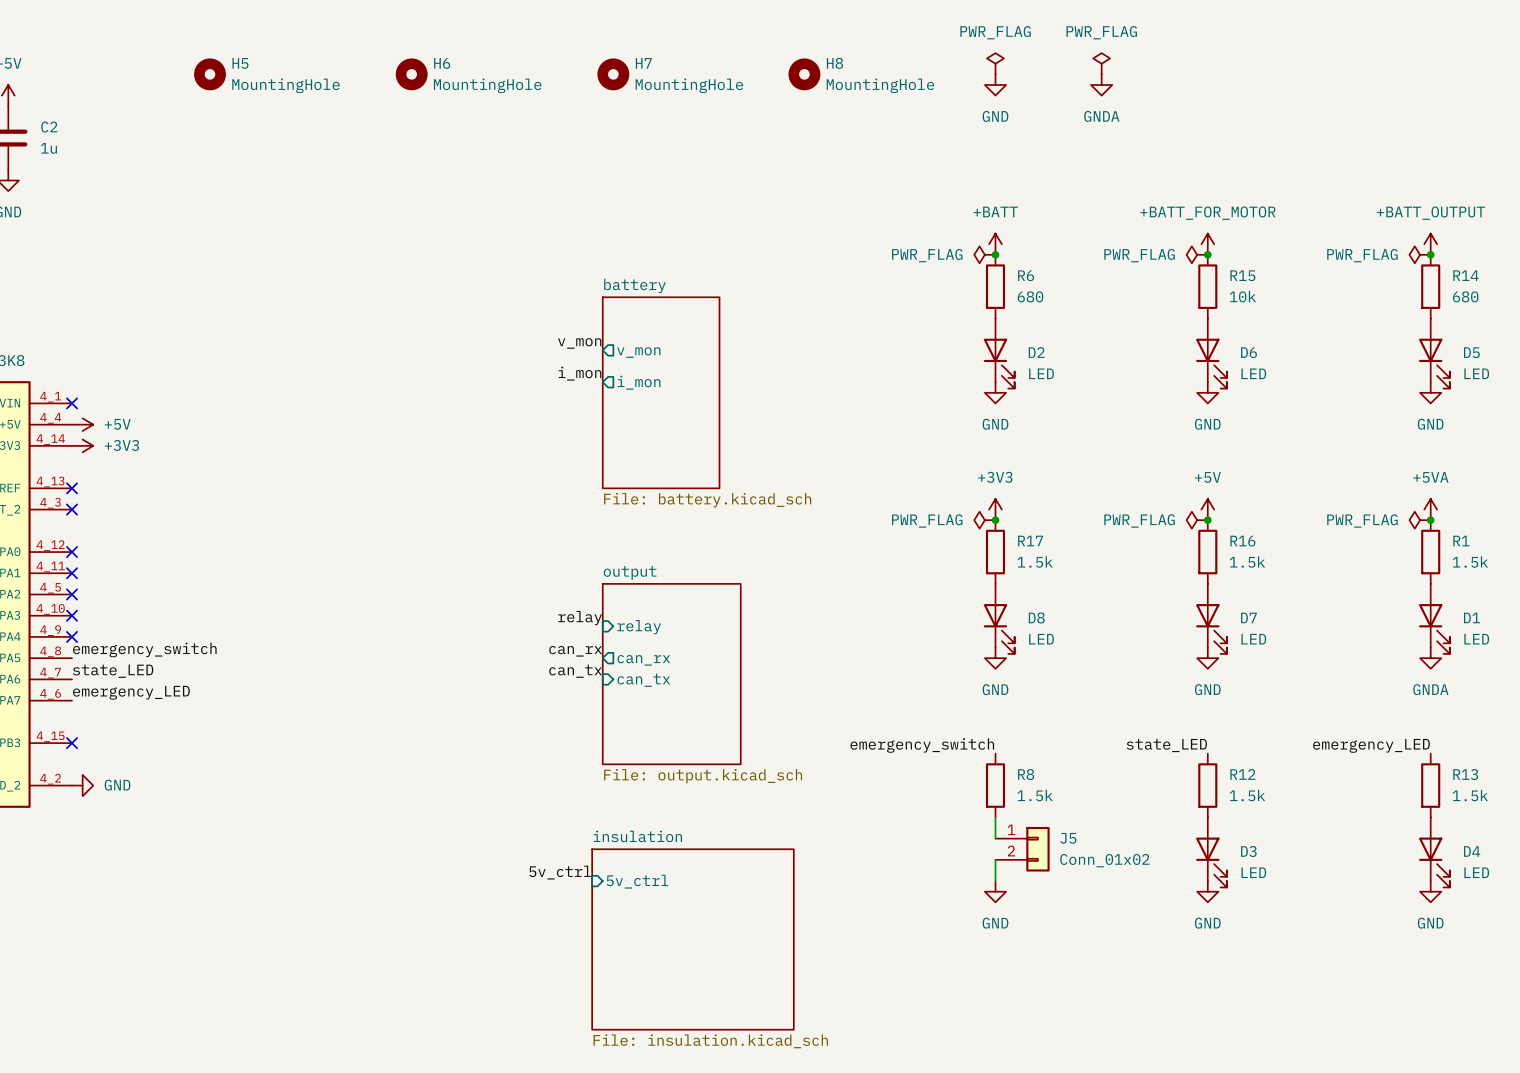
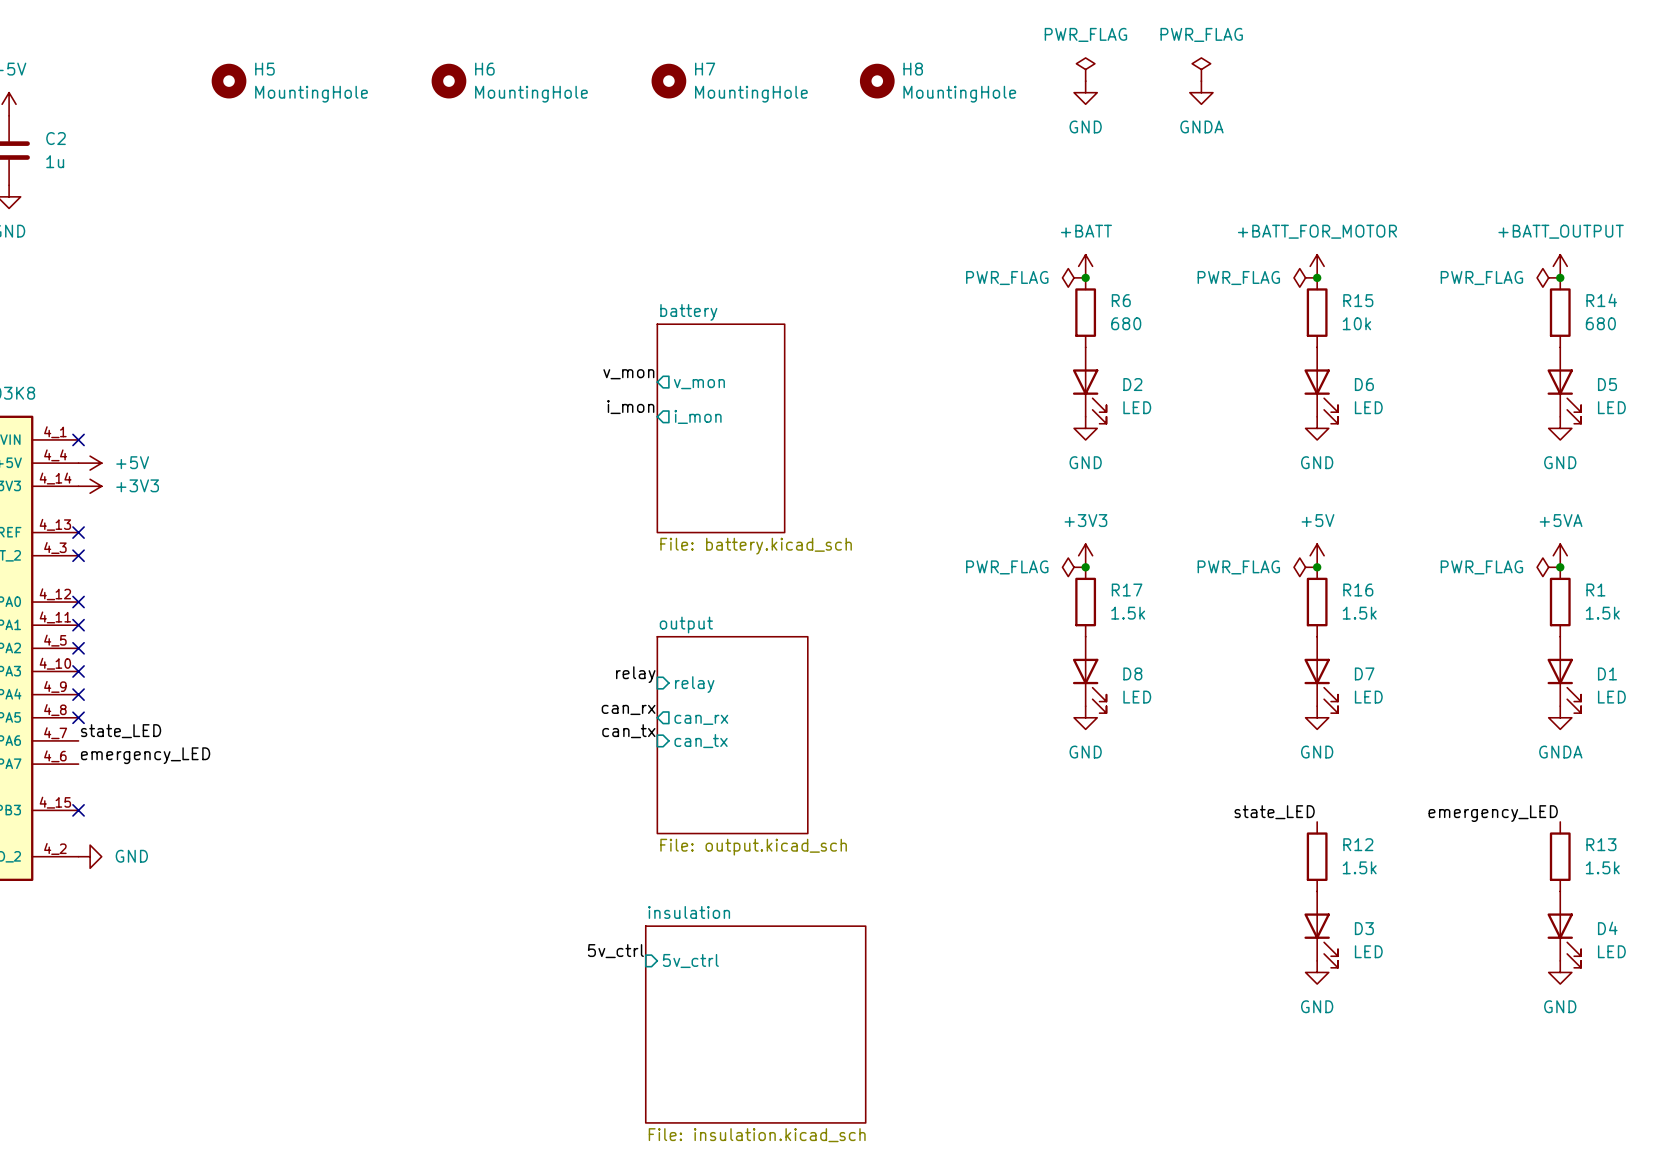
label: emergency_switch (144, 649) -> none
no-connect mark: none -> (78, 717)
label: emergency_switch (922, 745) -> none
R8: 1.5k (995, 785) -> none
wire: (995, 817) (995, 838) -> none
J5: Conn_01x02 (1022, 849) -> none
wire: (995, 859) (995, 881) -> none
power symbol: GND (995, 891) -> none

